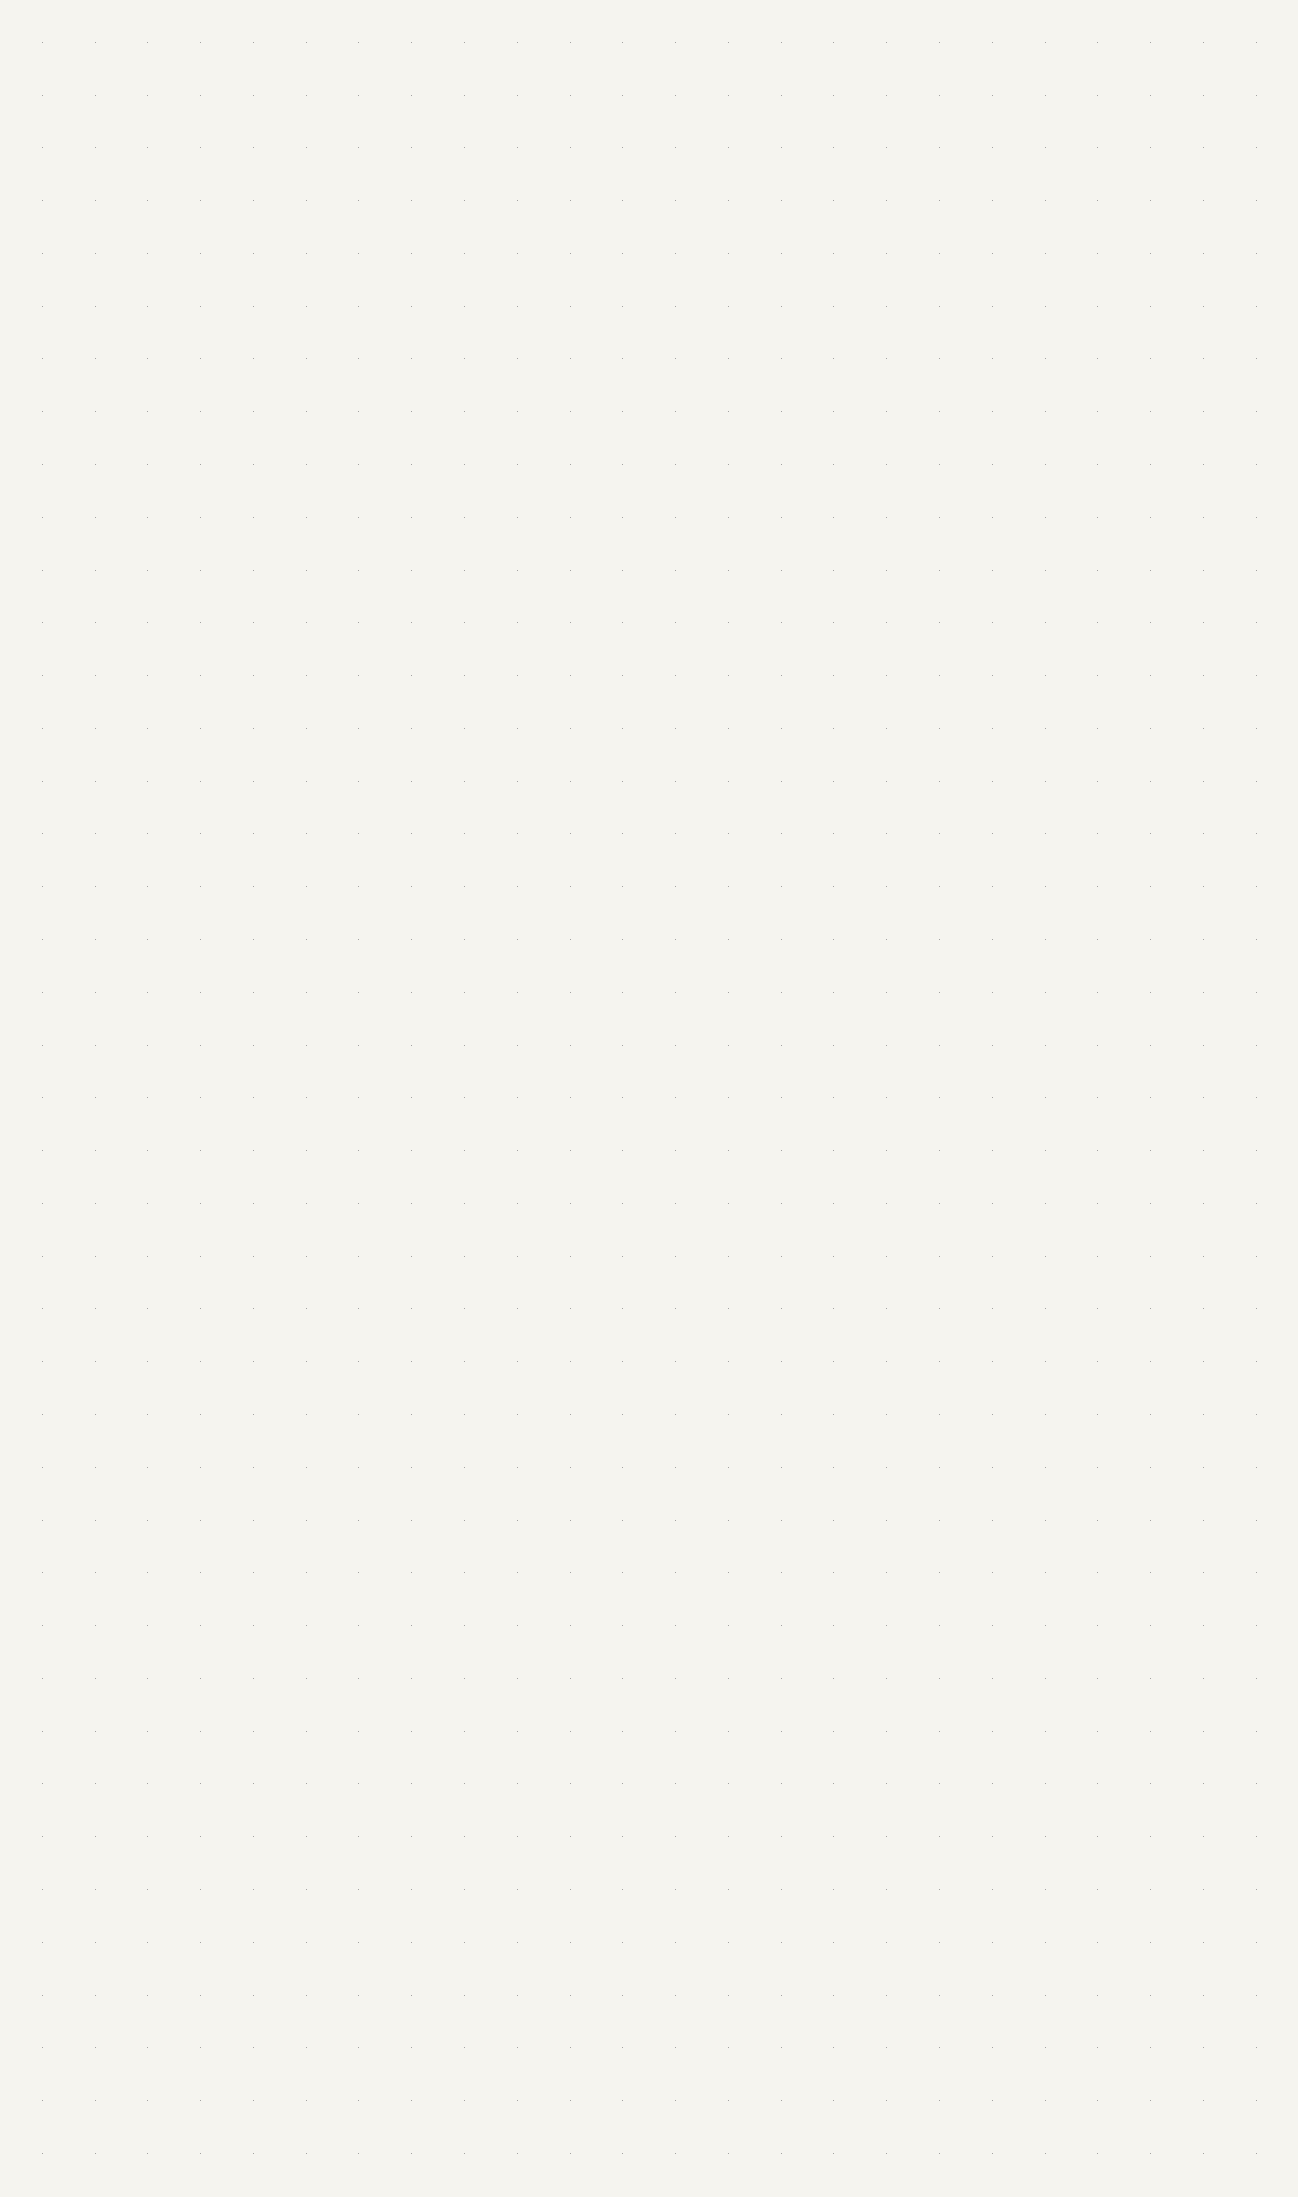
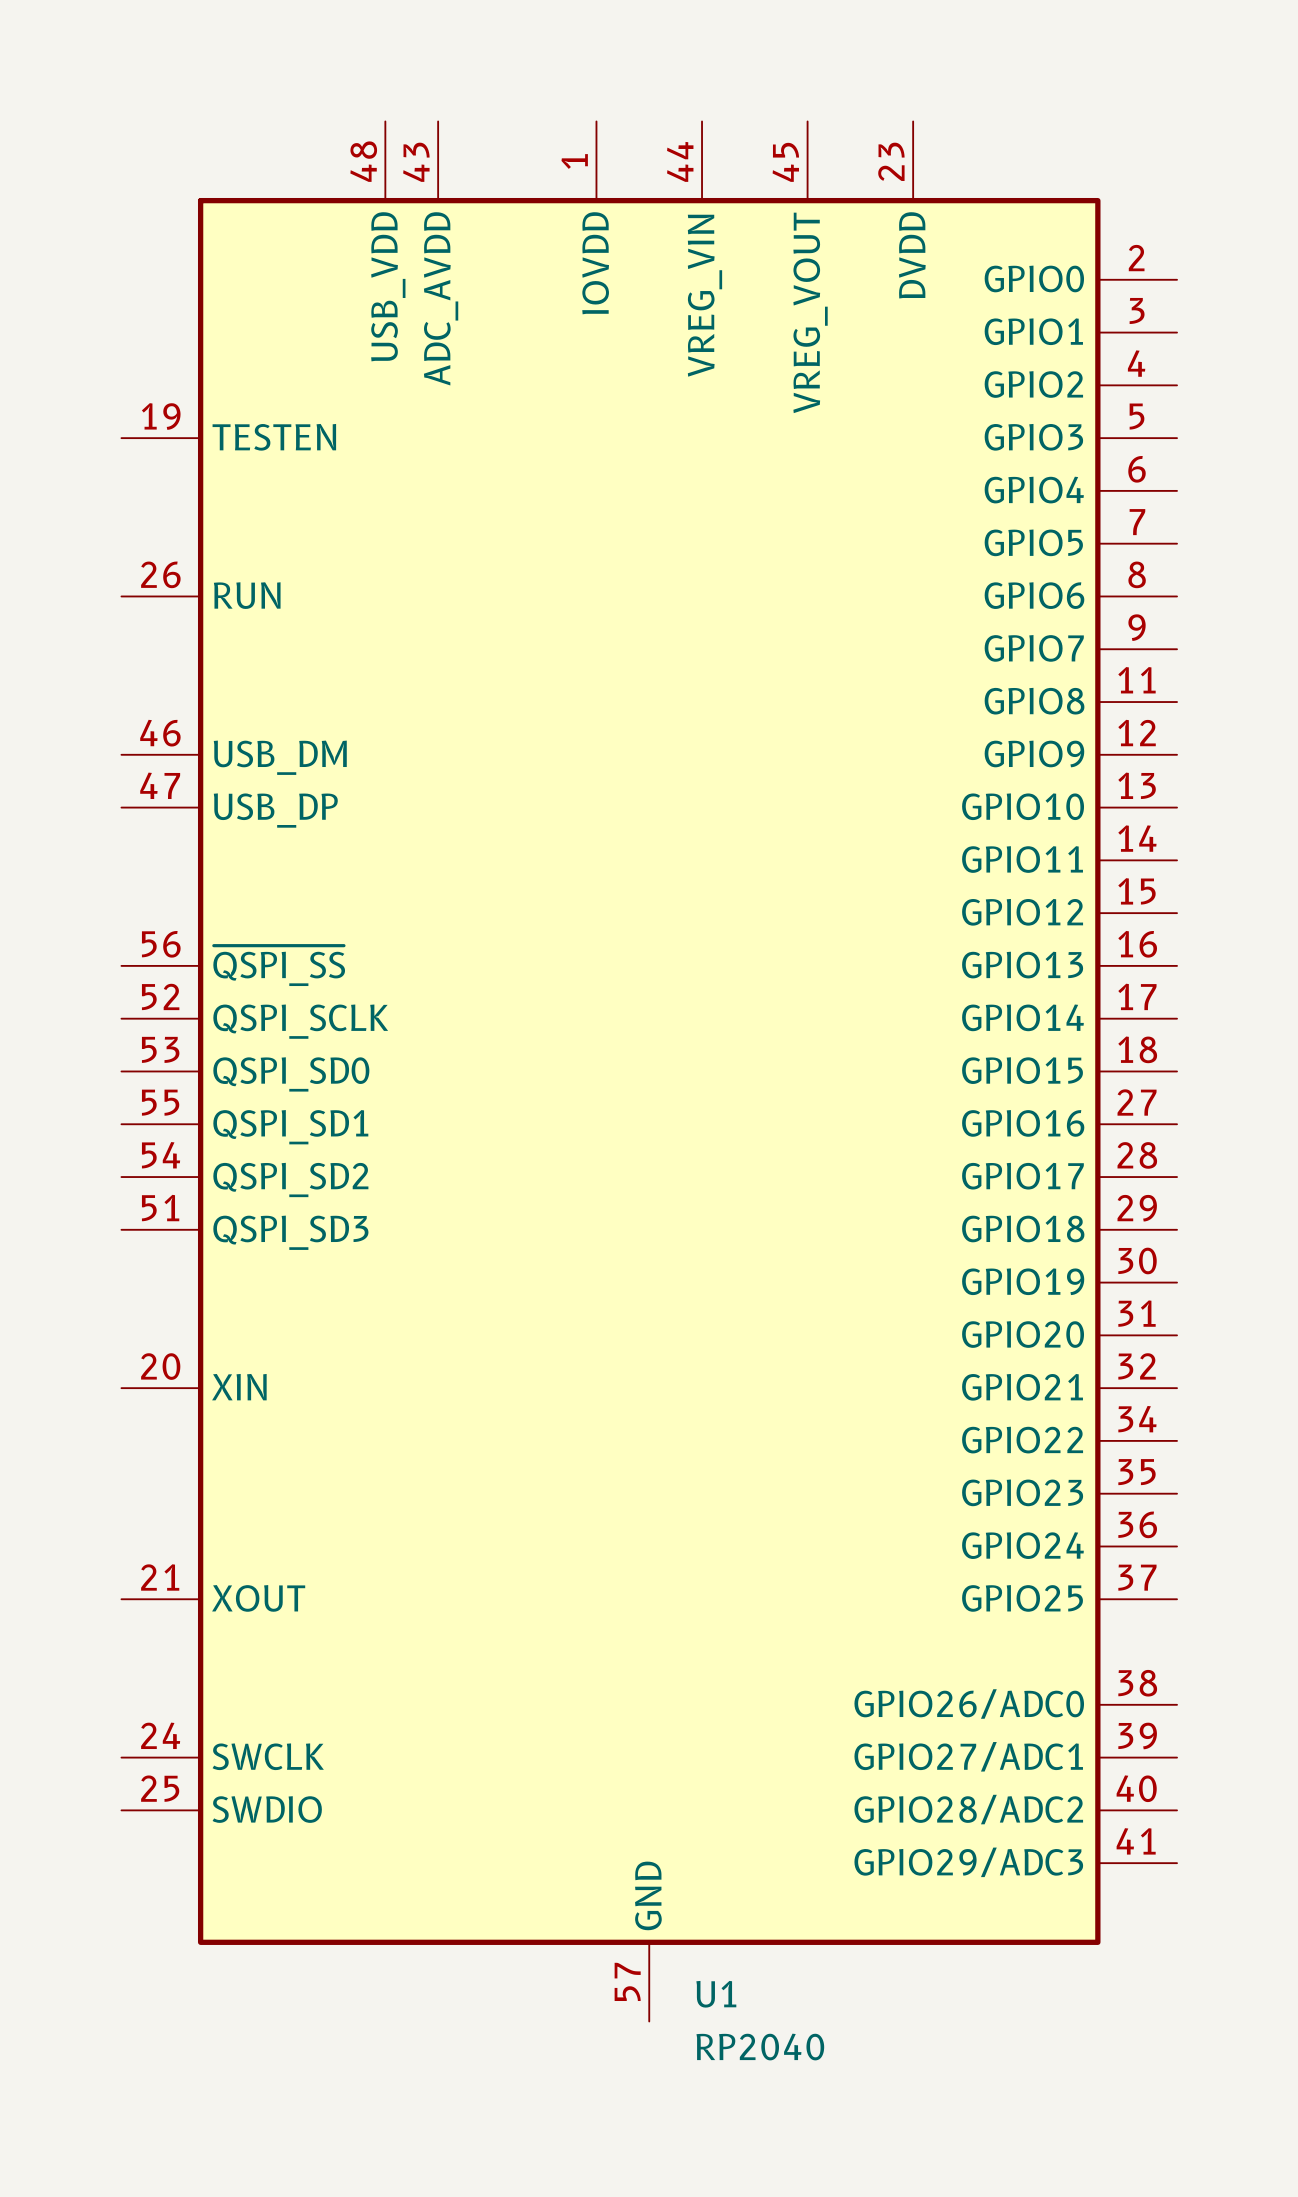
U1: none -> RP2040 (649, 1071)

